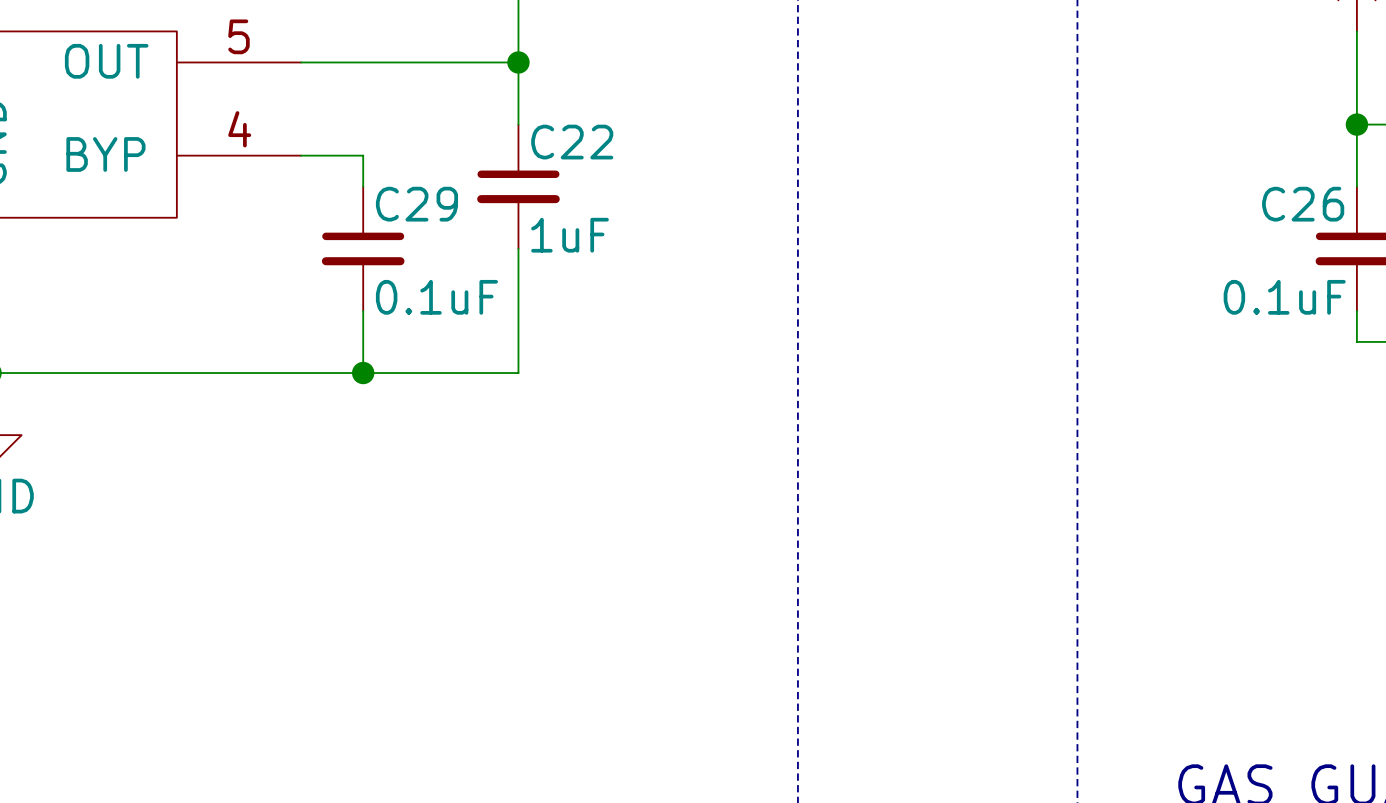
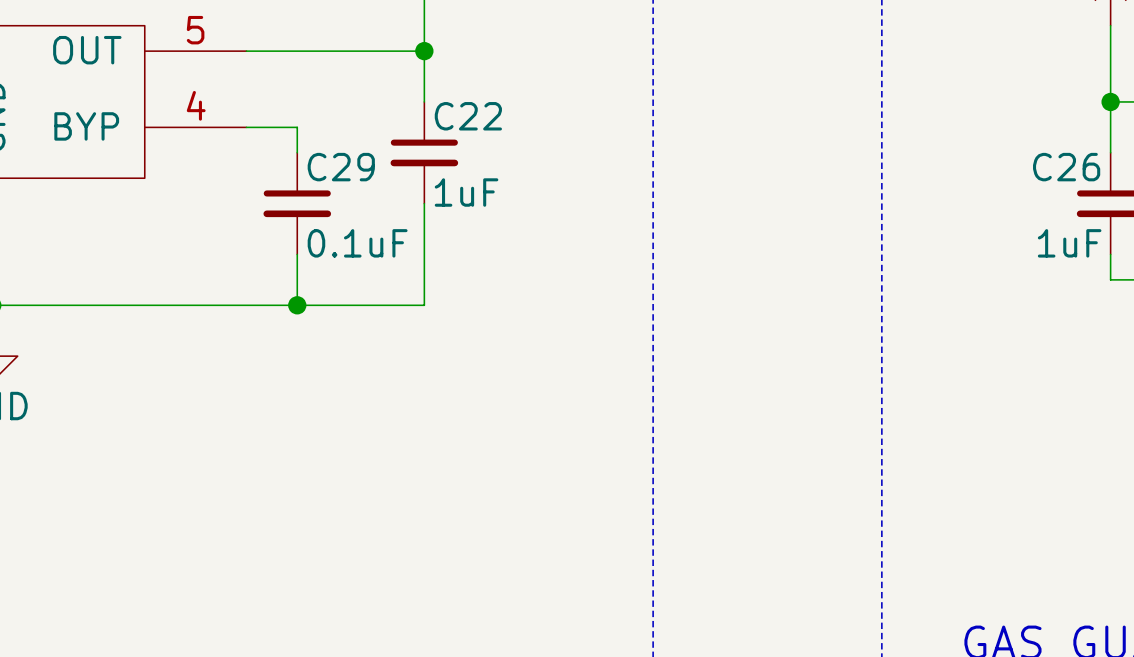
C26 value: 0.1uF (1284, 297) -> 1uF (1069, 243)

